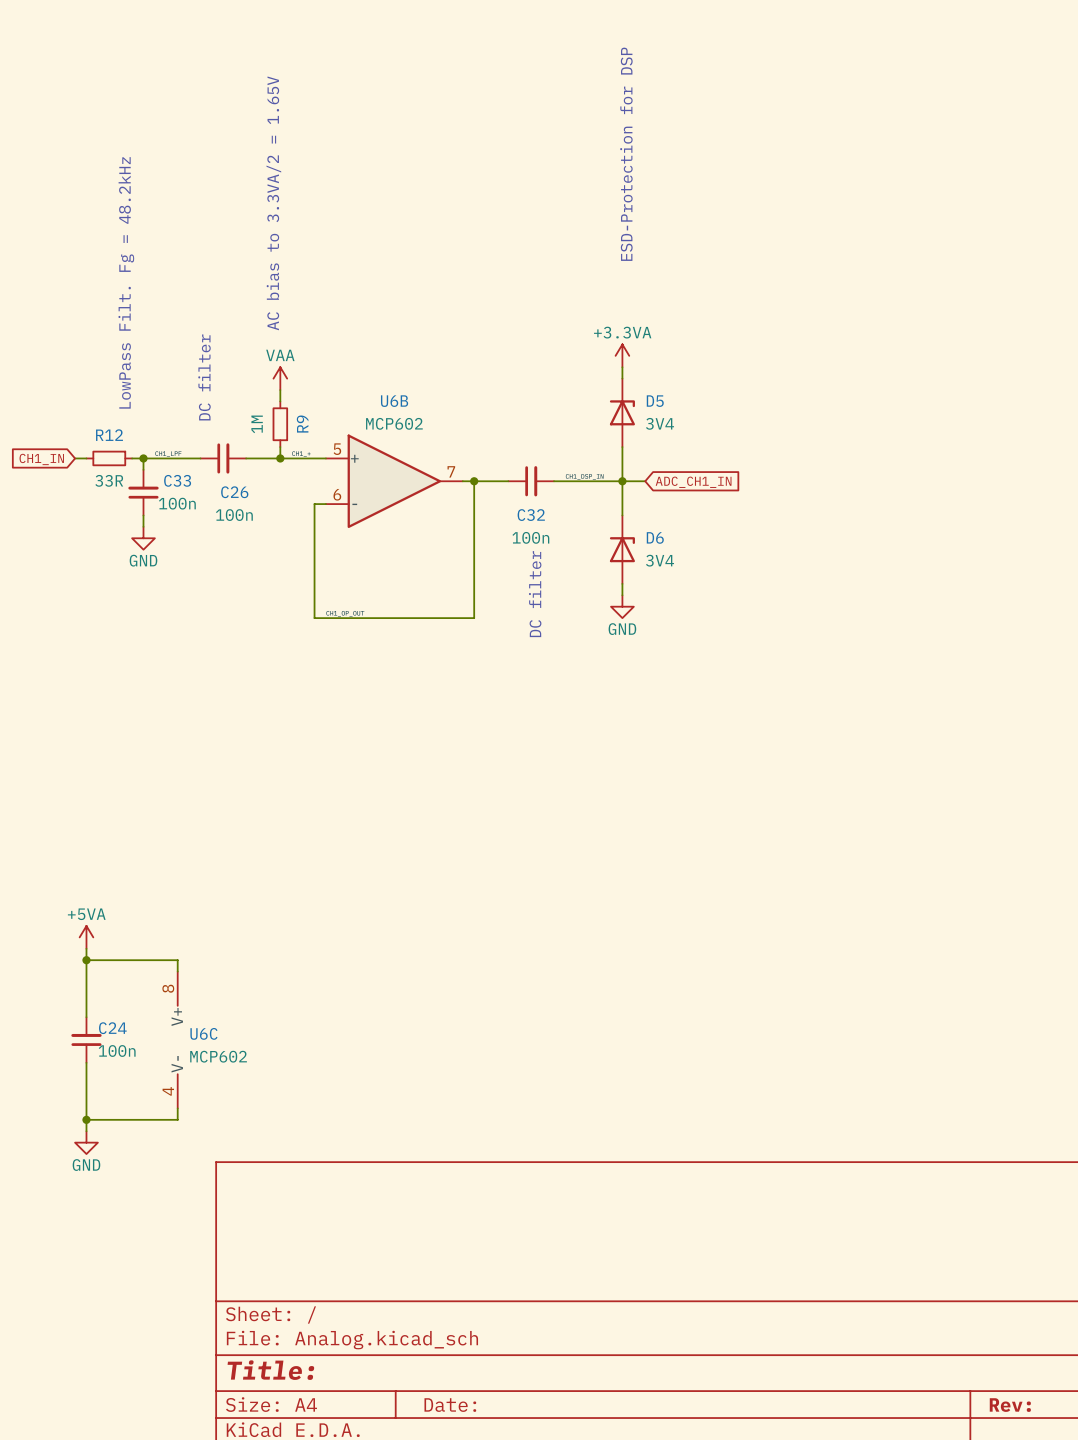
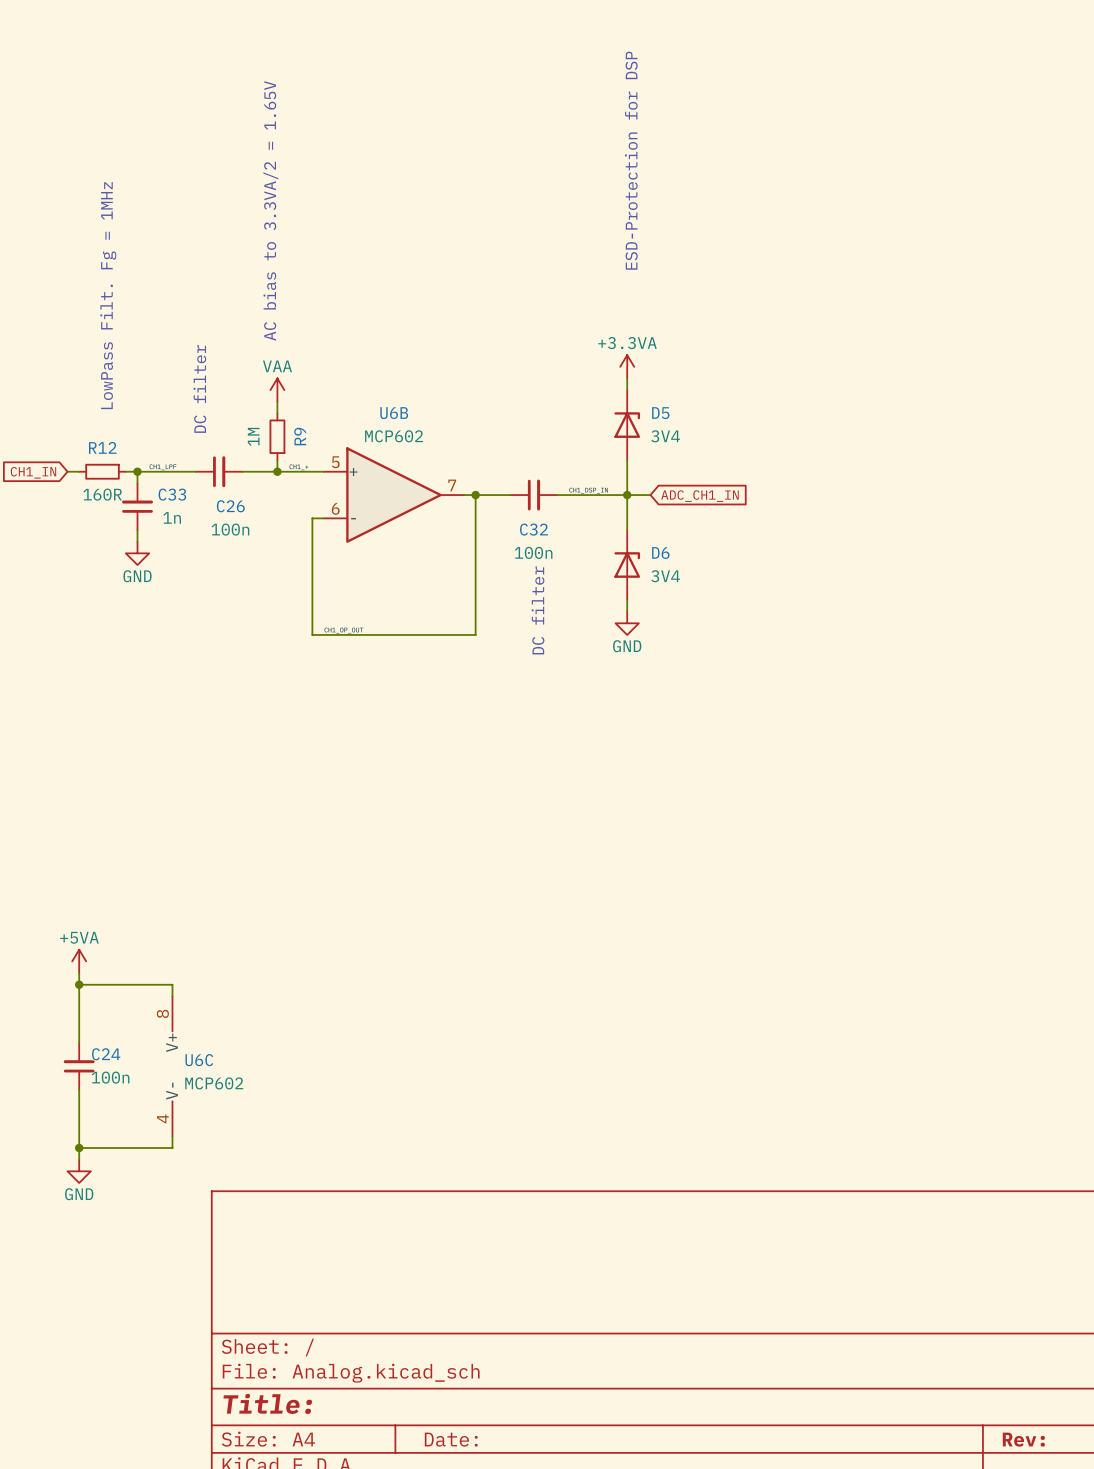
text: LowPass Filt. Fg = 48.2kHz (126, 282) -> LowPass Filt. Fg = 1MHz (108, 295)
R12 value: 33R (109, 480) -> 160R (102, 494)
C33 value: 100n (177, 503) -> 1n (172, 517)

